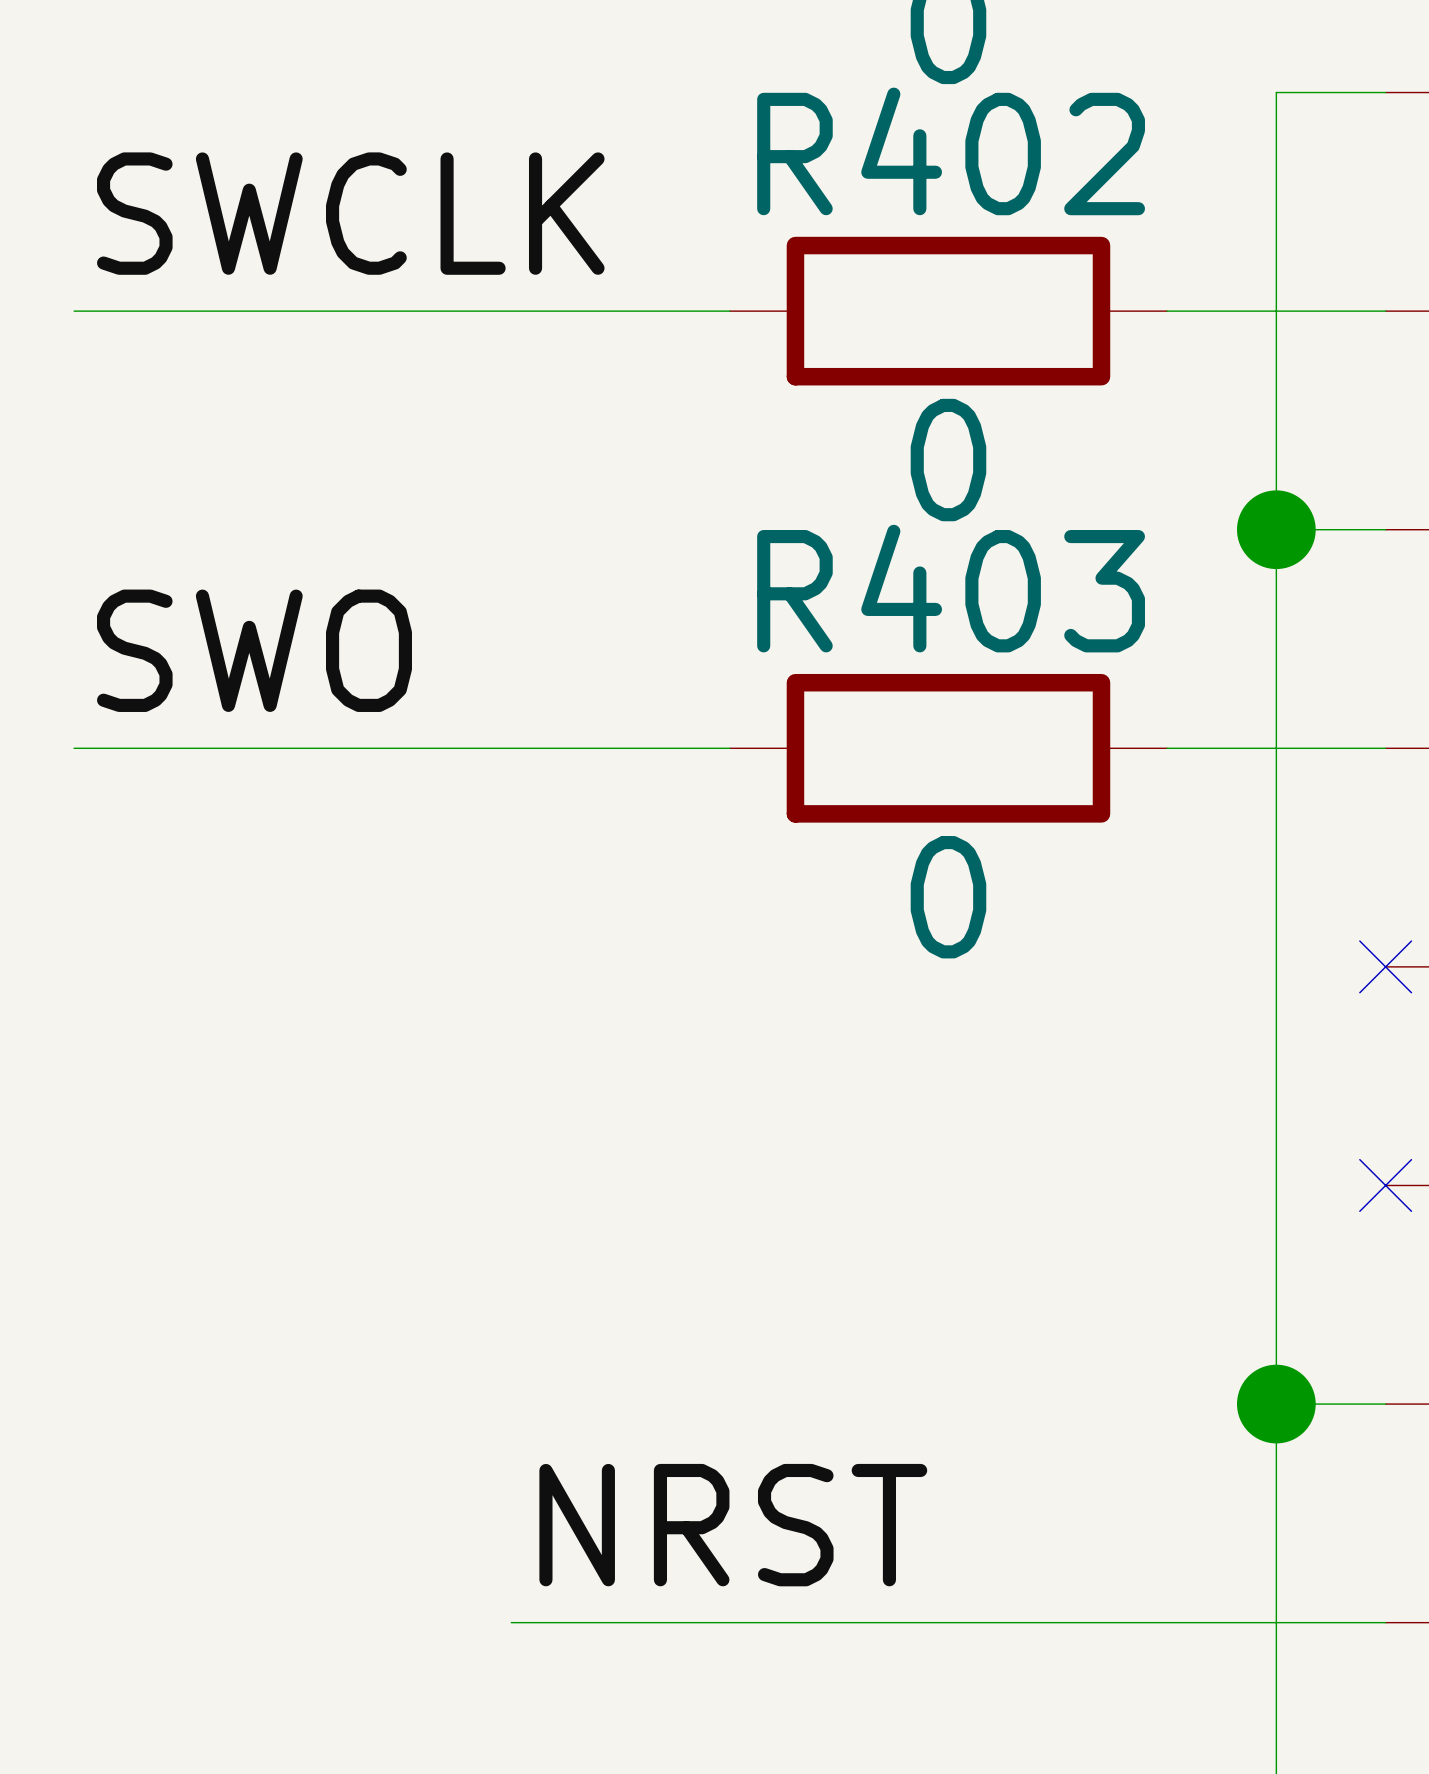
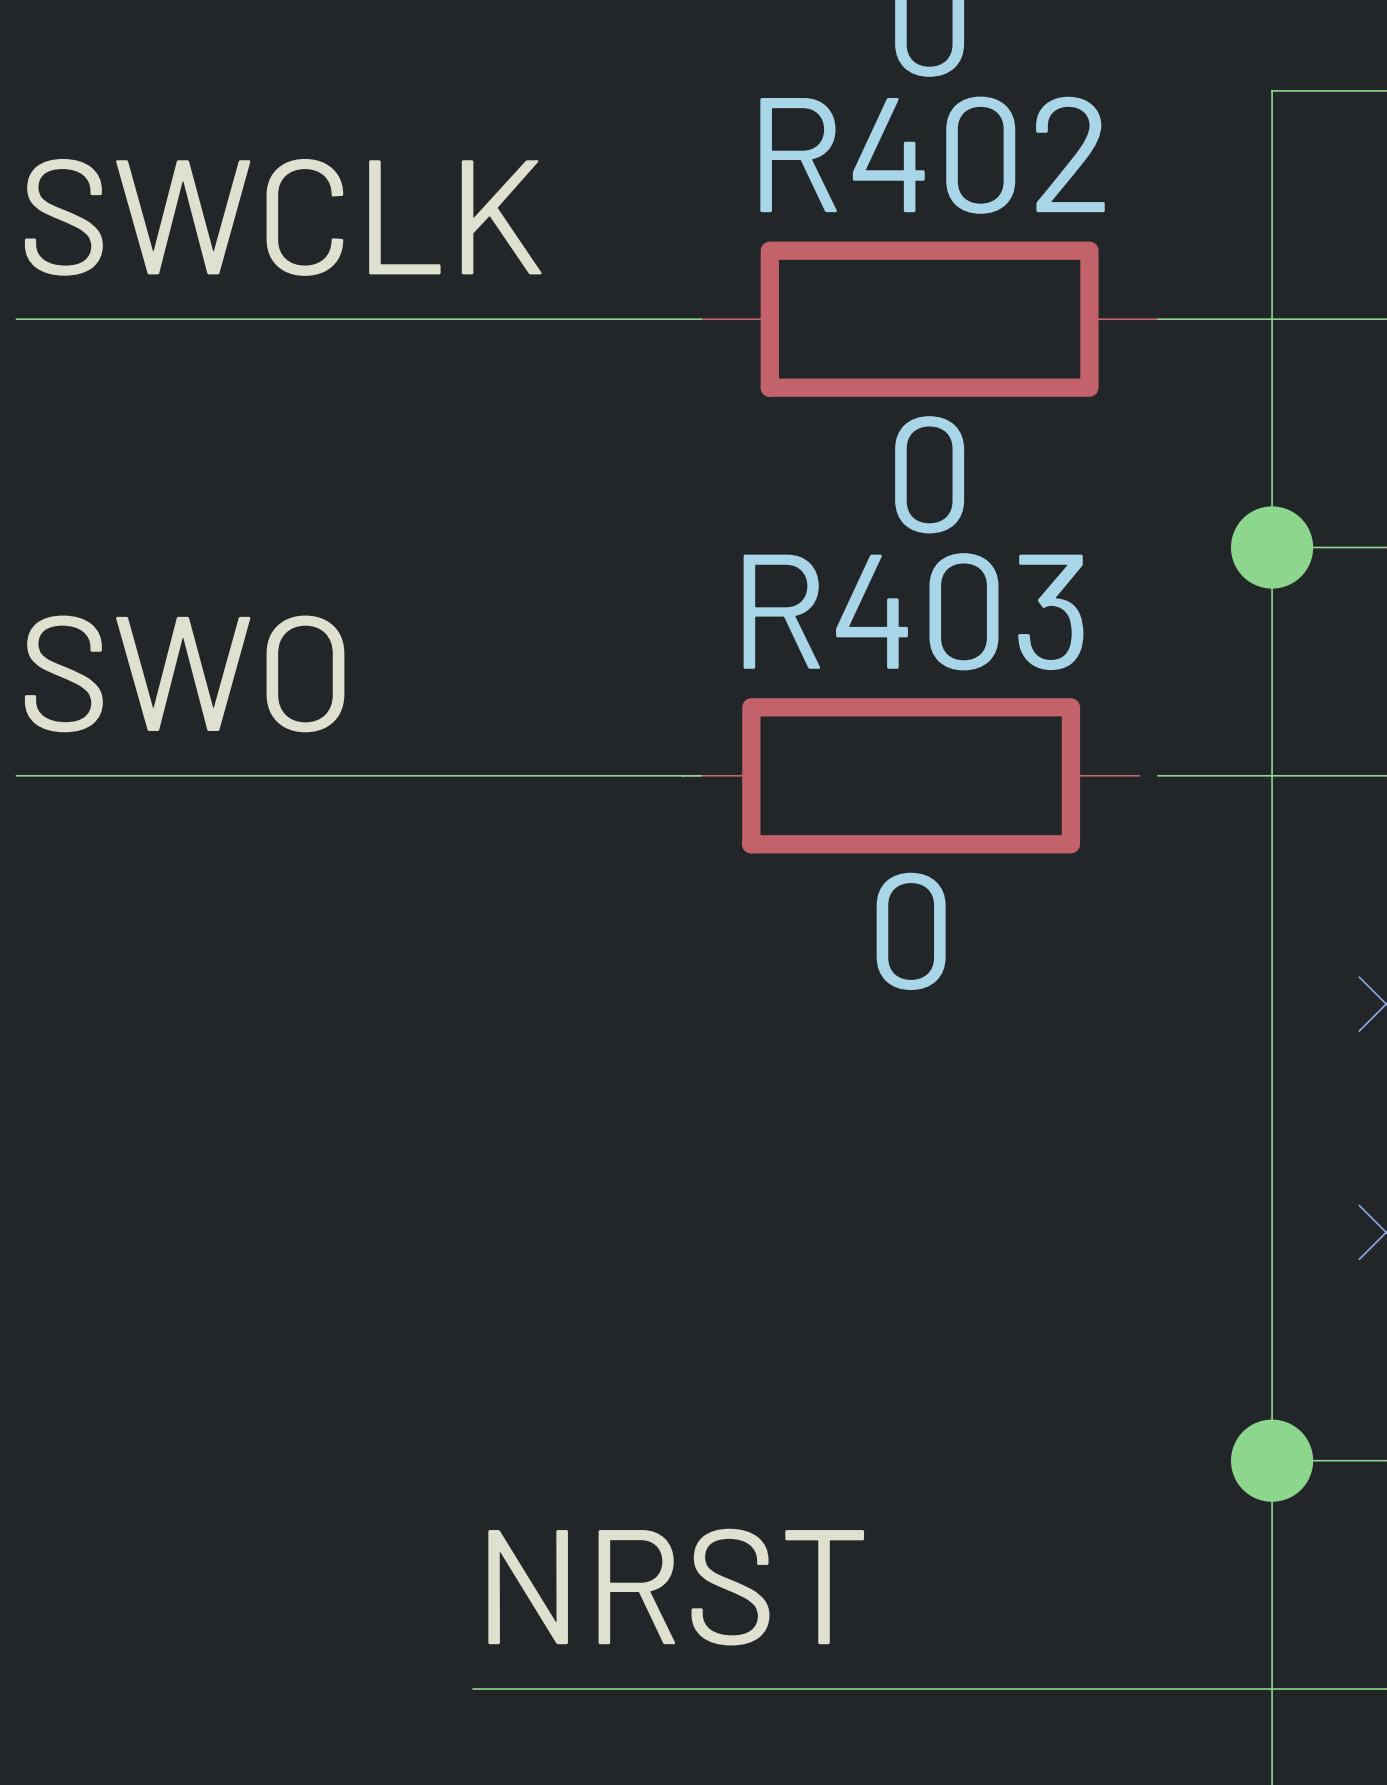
R403 position: (948, 748) -> (911, 775)

